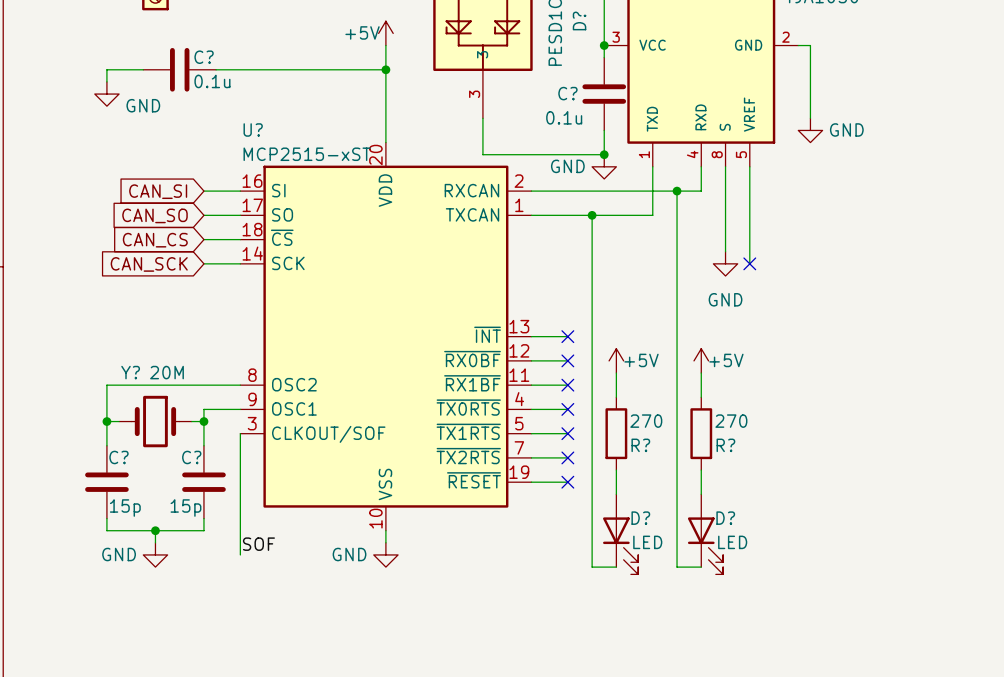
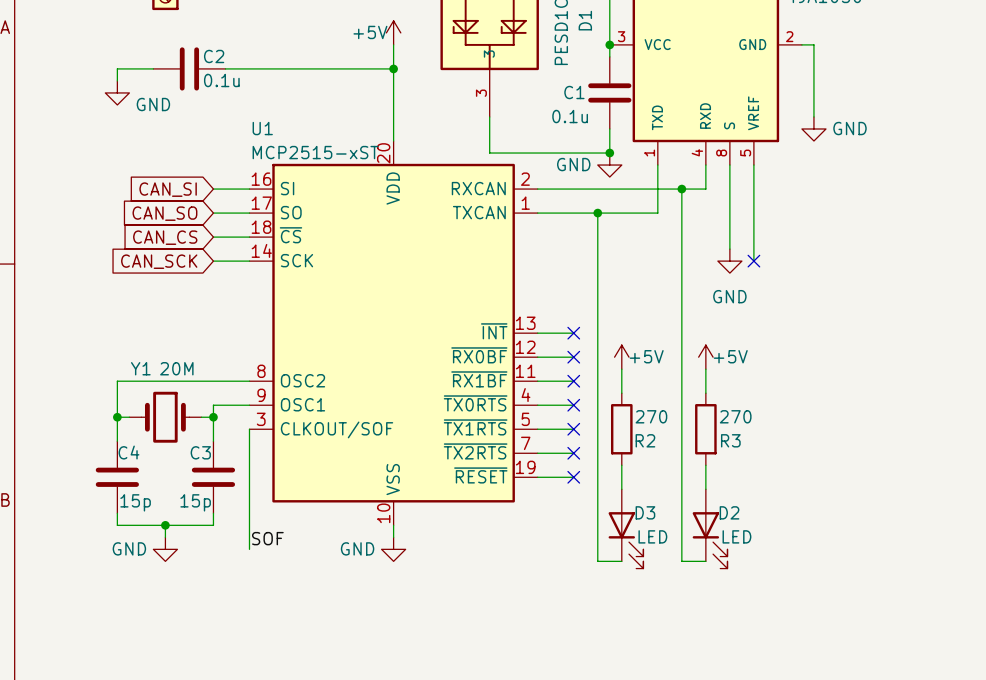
D? name: D? (579, 20) -> D1 (585, 20)
C? name: C? (204, 57) -> C2 (214, 56)
C? name: C? (567, 93) -> C1 (574, 92)
U? name: U? (253, 129) -> U1 (262, 128)
Y? name: Y? (130, 372) -> Y1 (140, 368)
R? name: R? (640, 445) -> R2 (645, 440)
R? name: R? (725, 445) -> R3 (730, 440)
C? name: C? (118, 457) -> C4 (129, 452)
C? name: C? (191, 457) -> C3 (200, 452)
D? name: D? (640, 518) -> D3 (645, 512)
D? name: D? (725, 518) -> D2 (729, 512)

